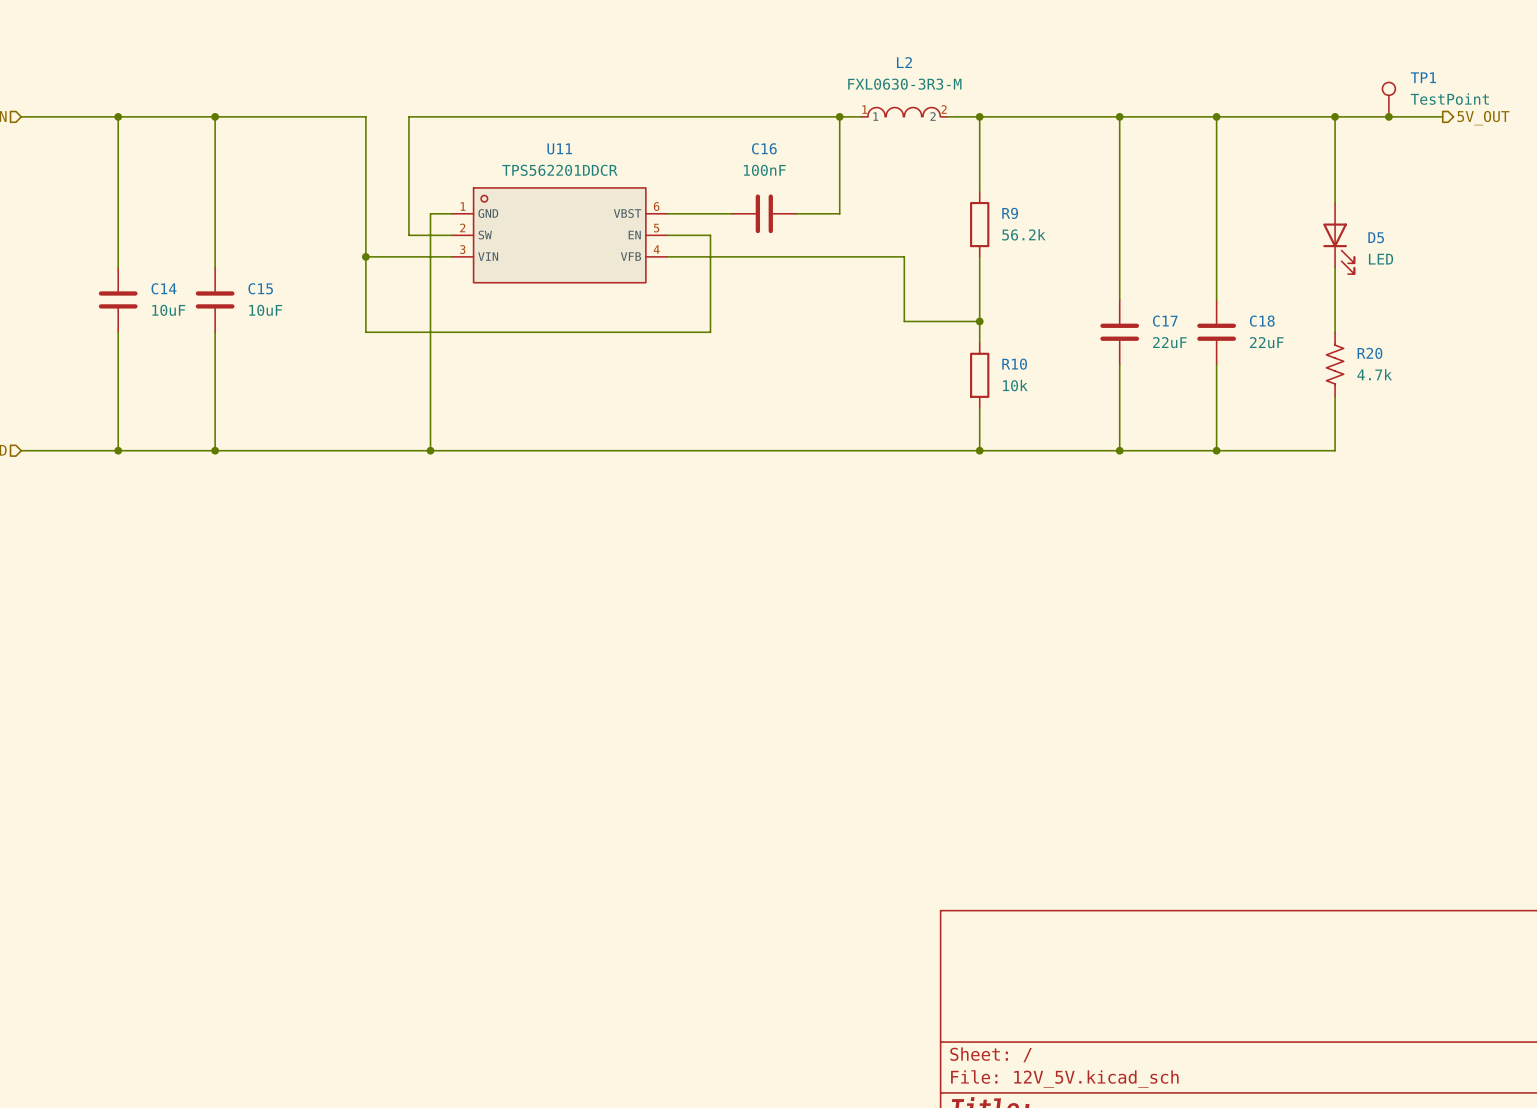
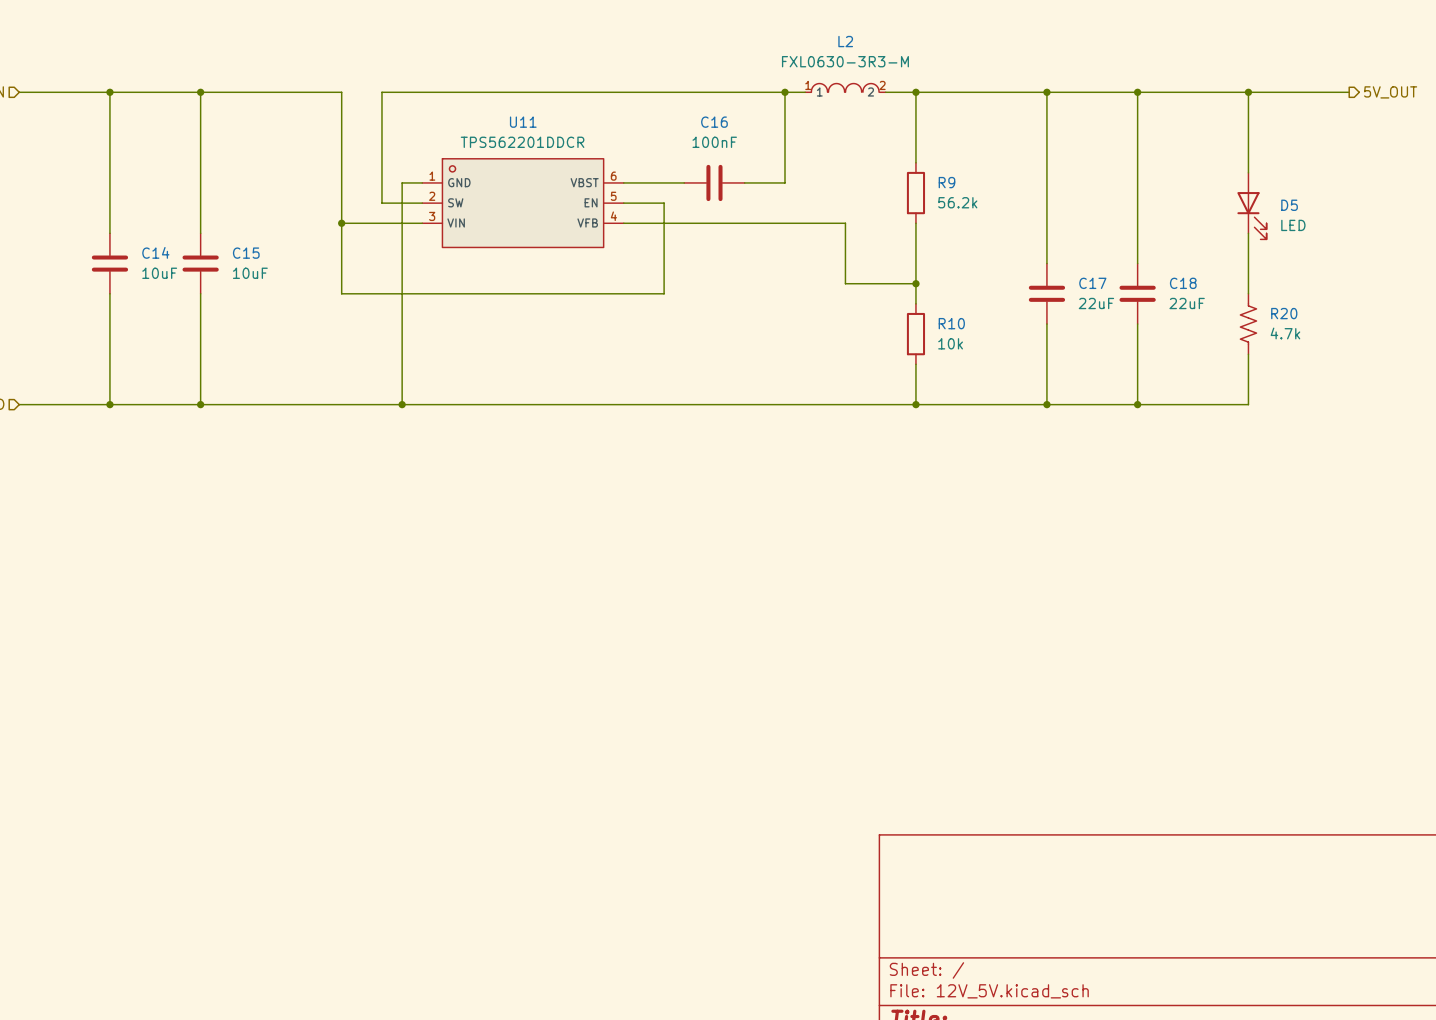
TP1: TestPoint (1388, 99) -> none
junction: (1388, 116) -> none

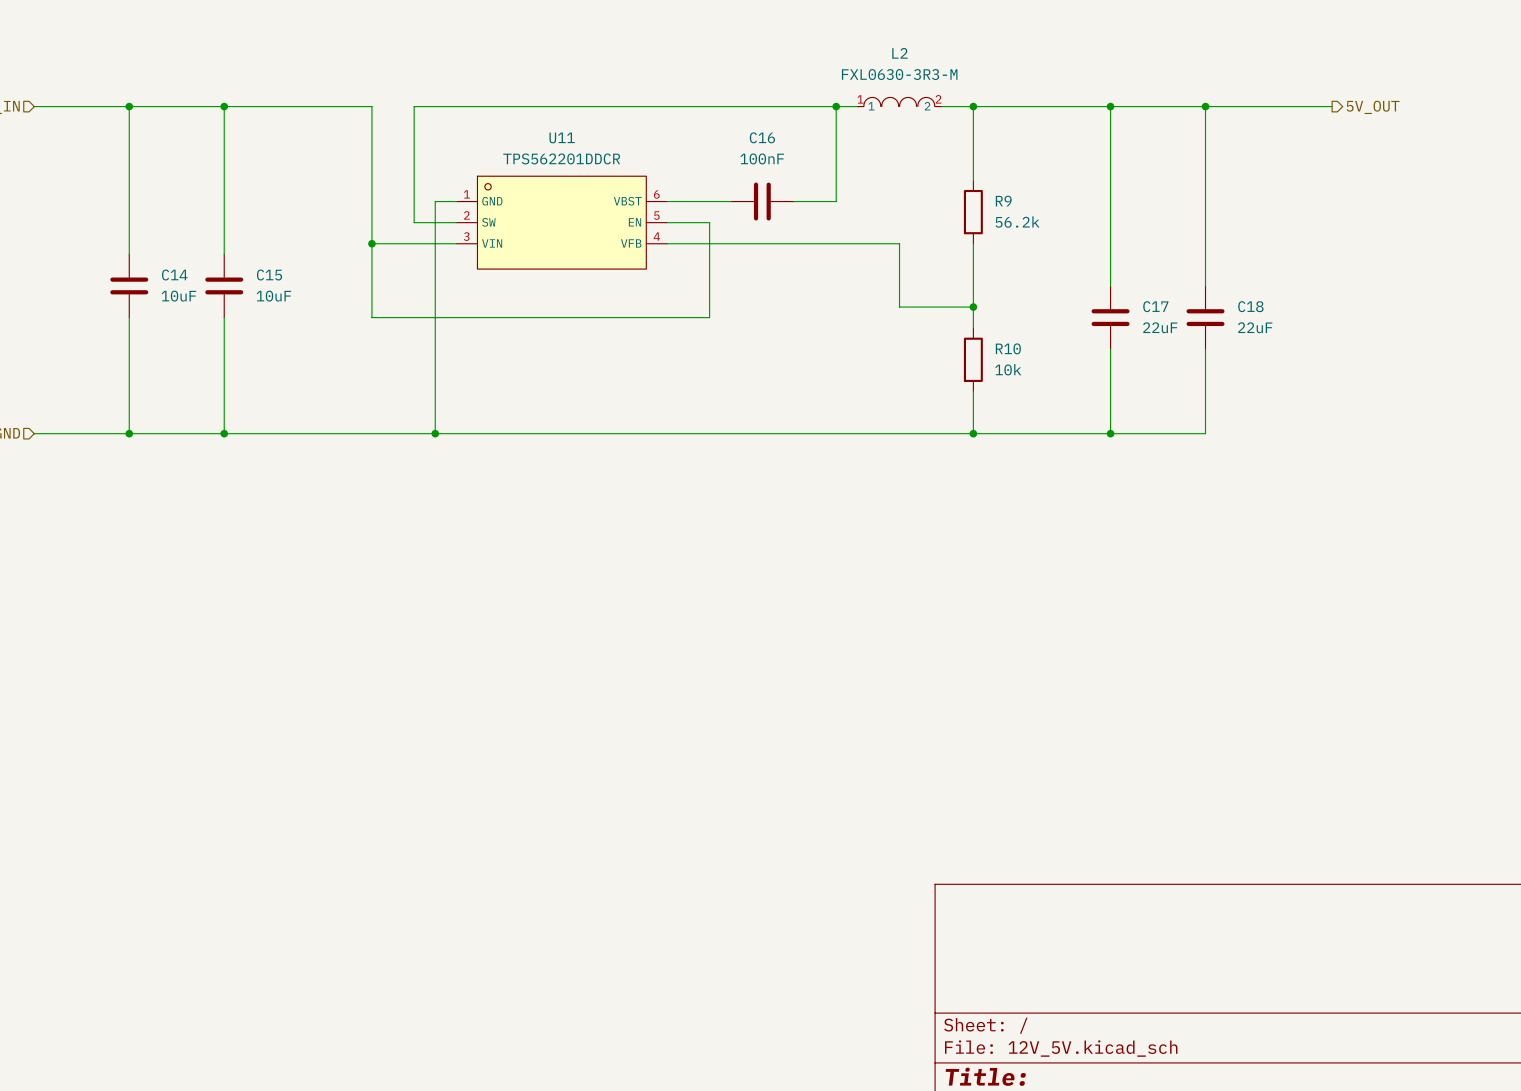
wire: (1248, 92) (1248, 172) -> none
junction: (1248, 92) -> none
wire: (1258, 92) (1349, 92) -> none
hierarchical label position: 5V_OUT (1390, 92) -> 5V_OUT (1373, 107)
D5: LED (1251, 206) -> none
wire: (1248, 233) (1248, 293) -> none
R20: 4.7k (1248, 324) -> none
wire: (1248, 354) (1248, 404) (1137, 404) -> none
junction: (1137, 404) -> none

